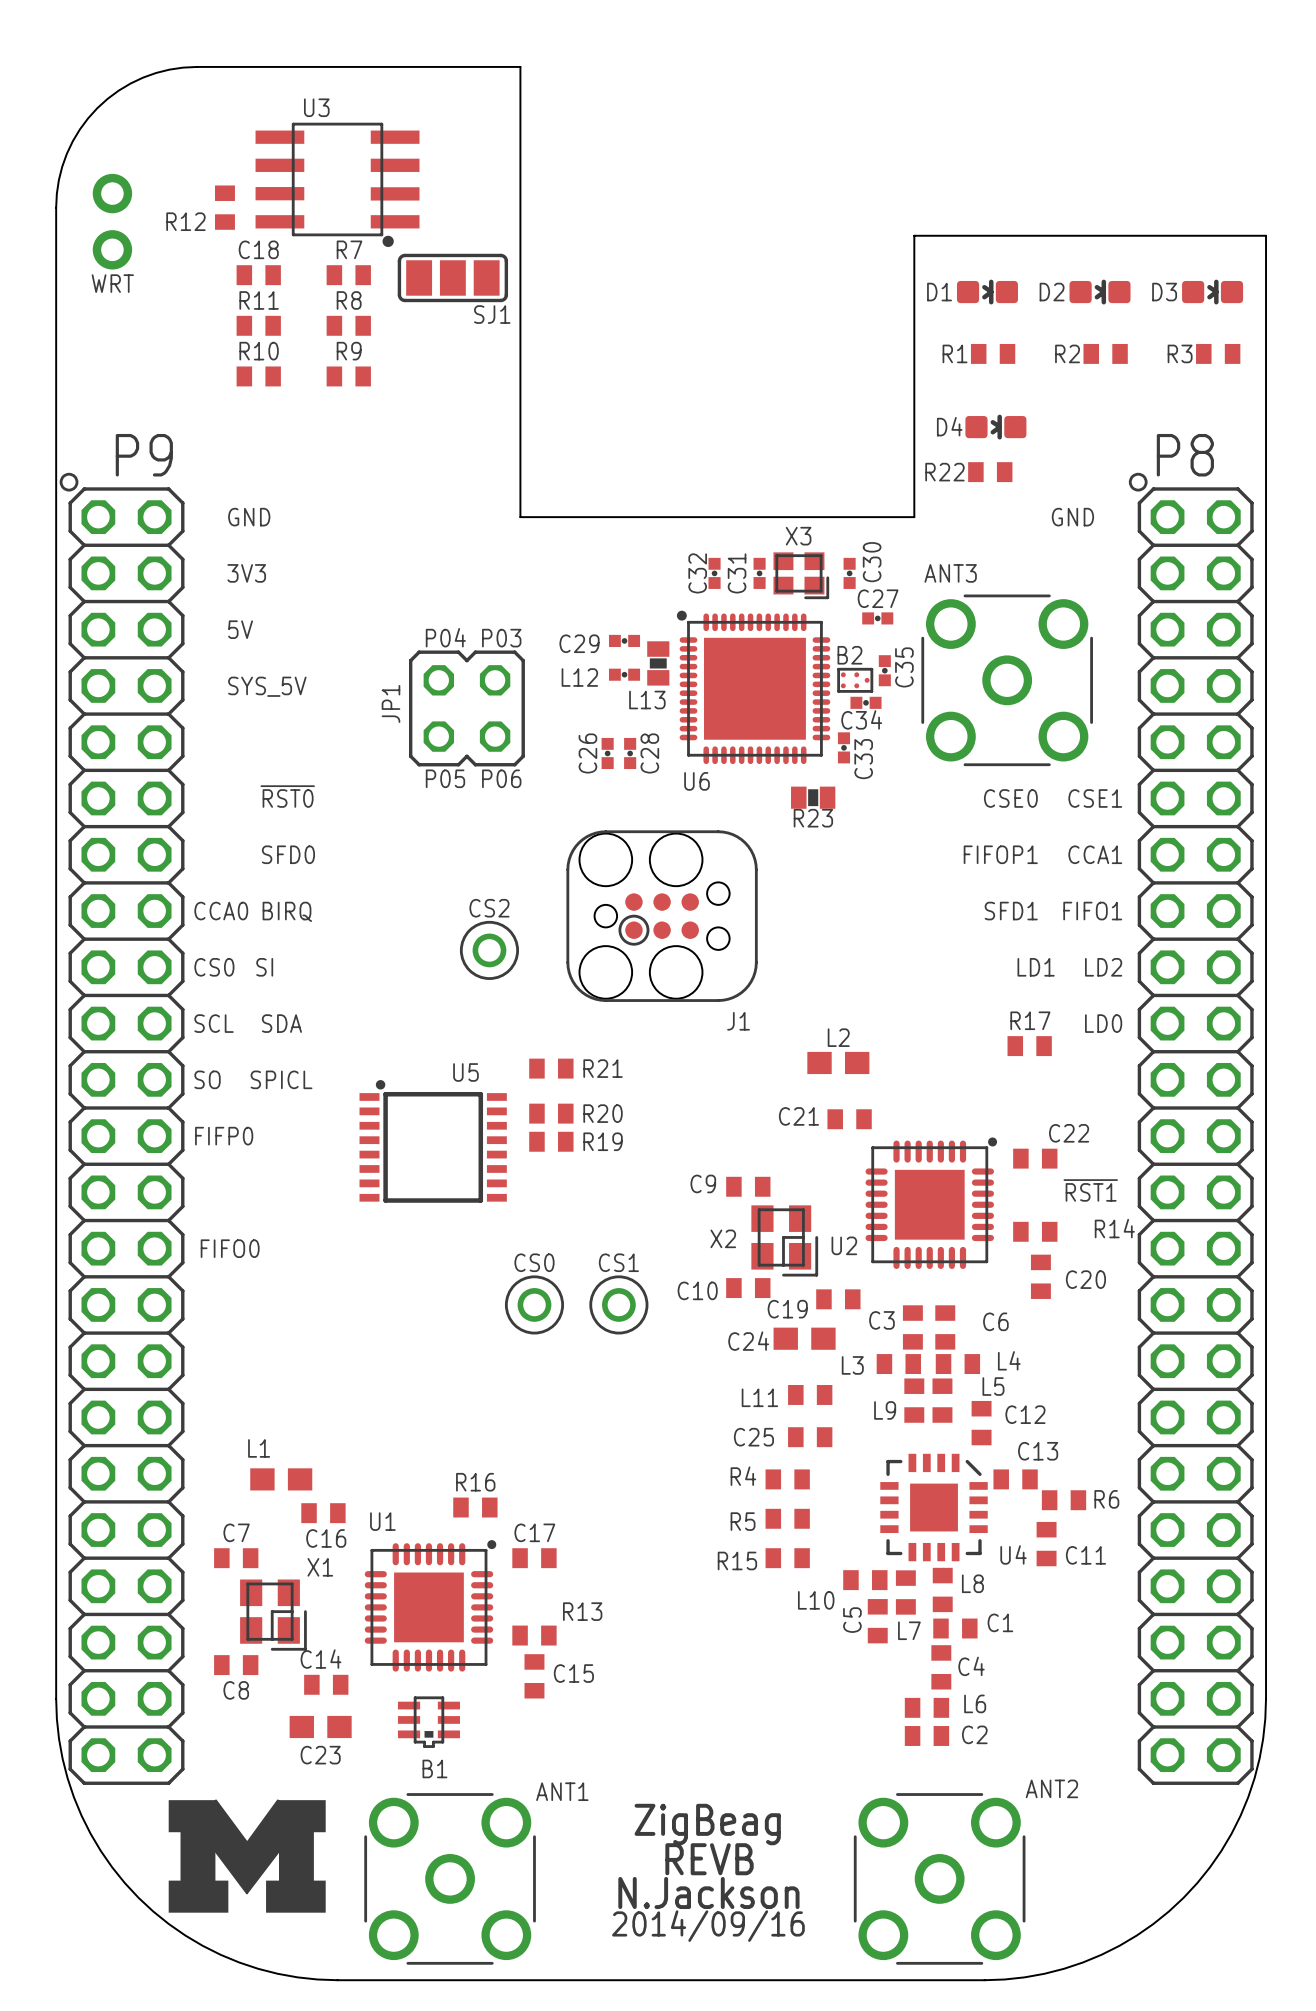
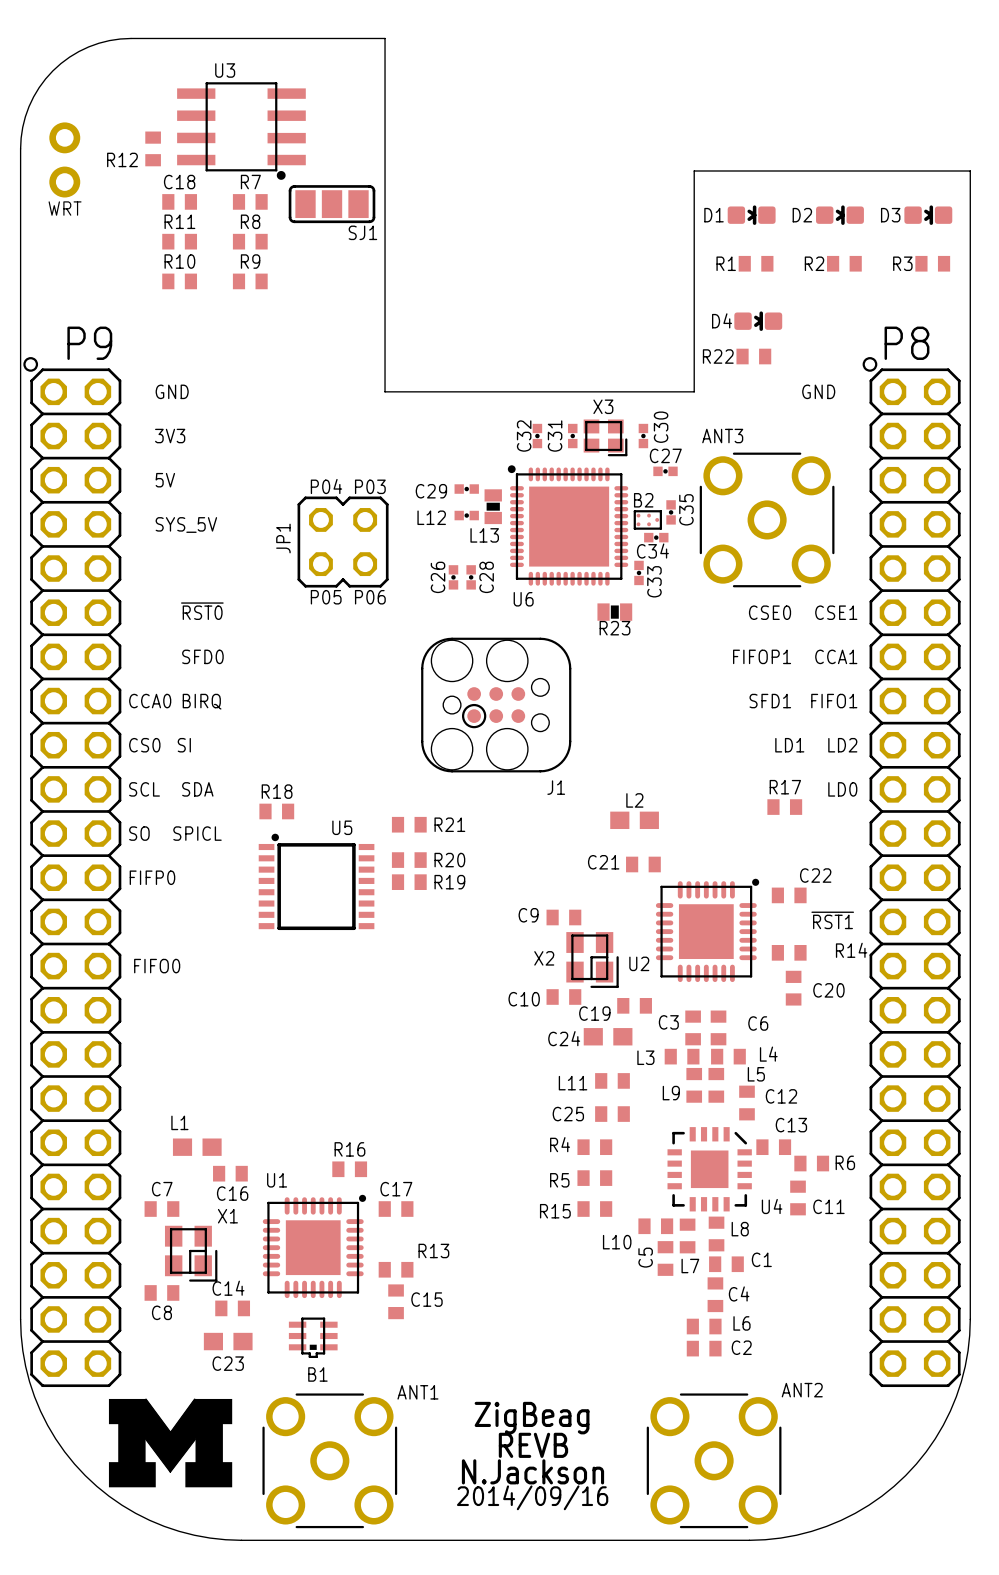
CS2: (489, 950) -> none
R18: none -> (276, 811)
CS0: (534, 1304) -> none
CS1: (618, 1304) -> none

